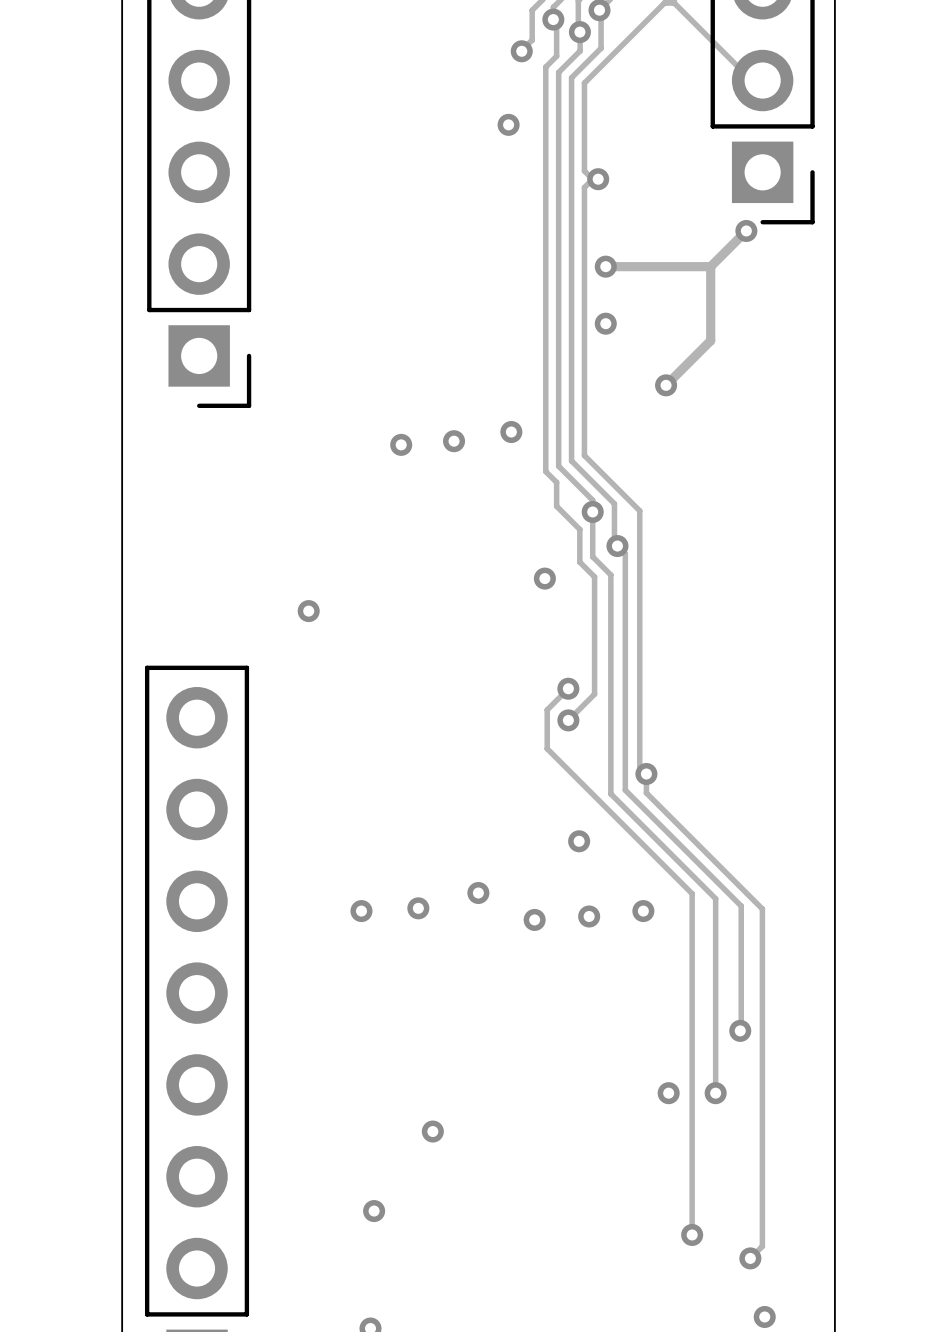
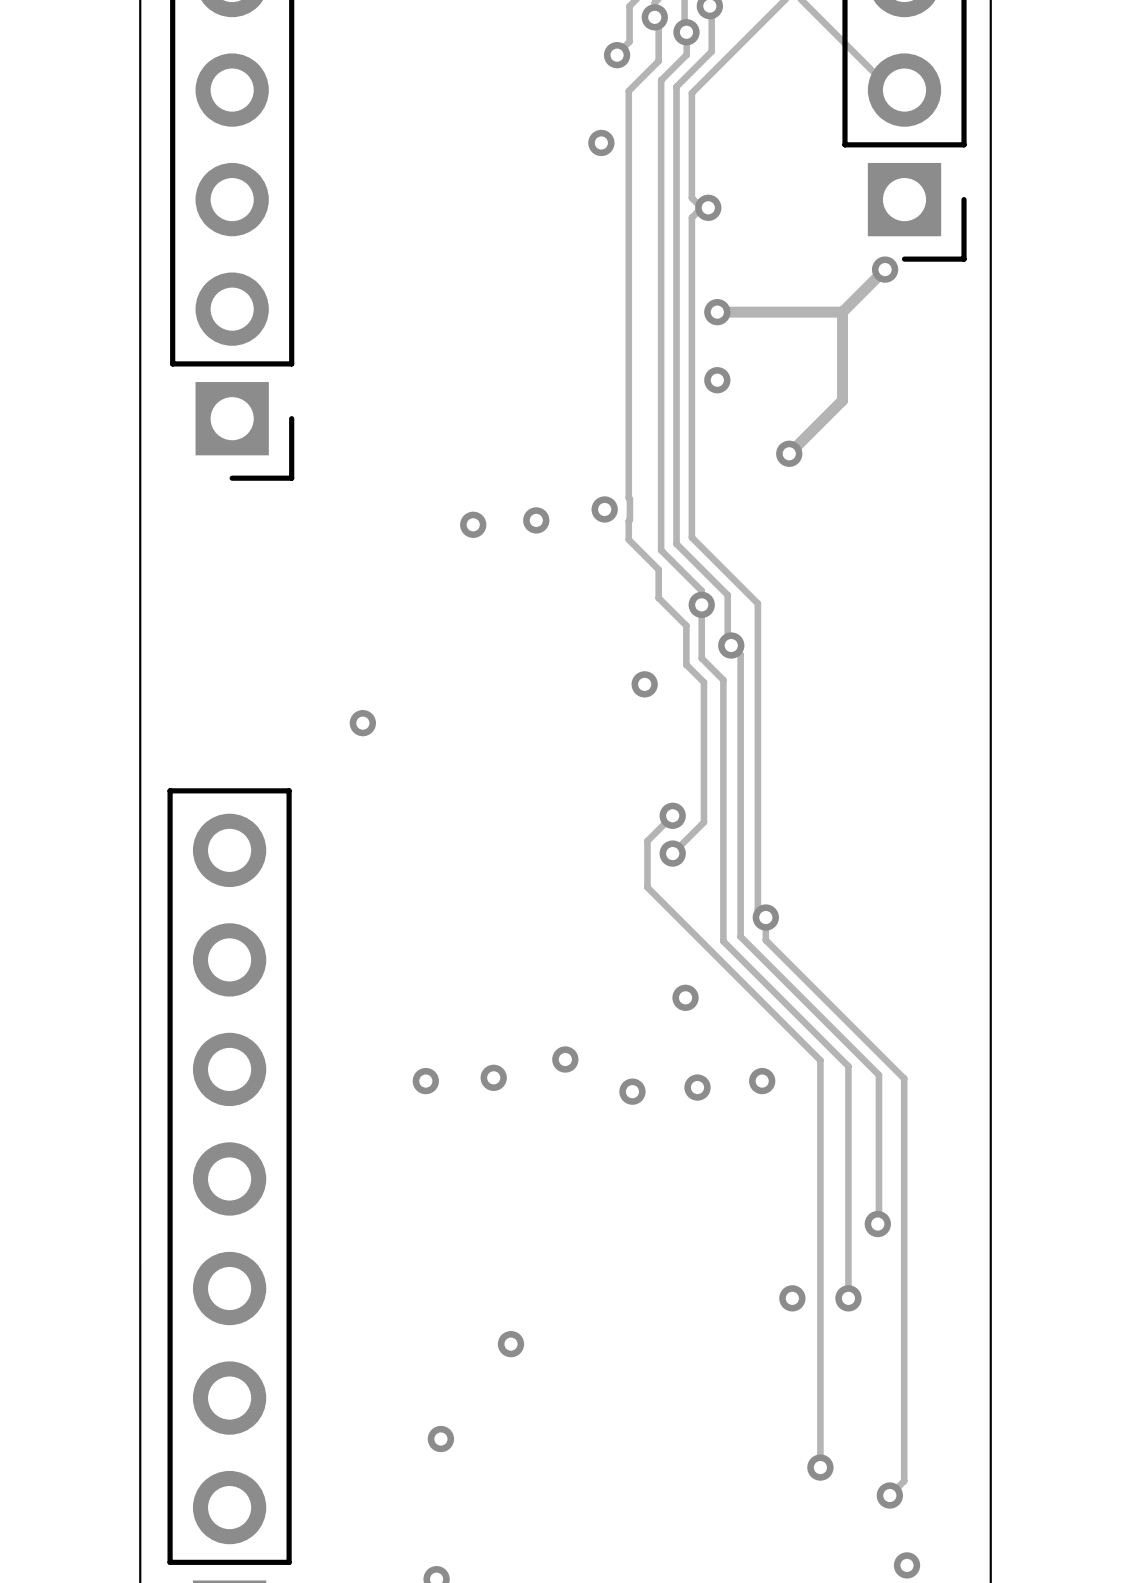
track: (545, 67) (545, 471) -> (645, 74) (628, 91) (628, 539) (645, 556)

